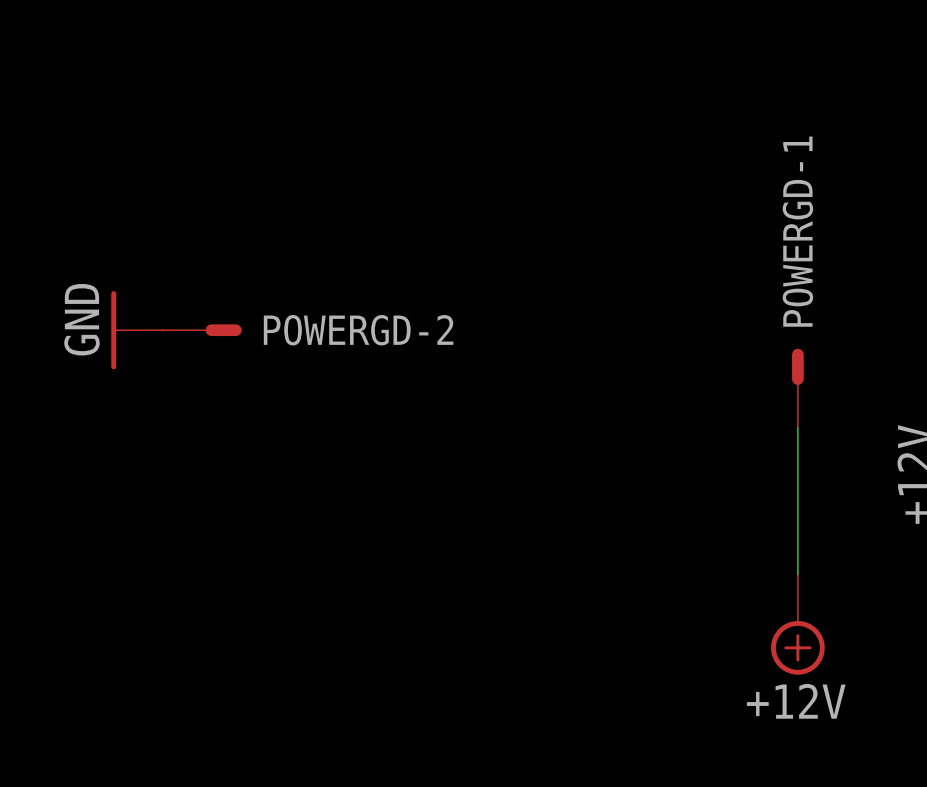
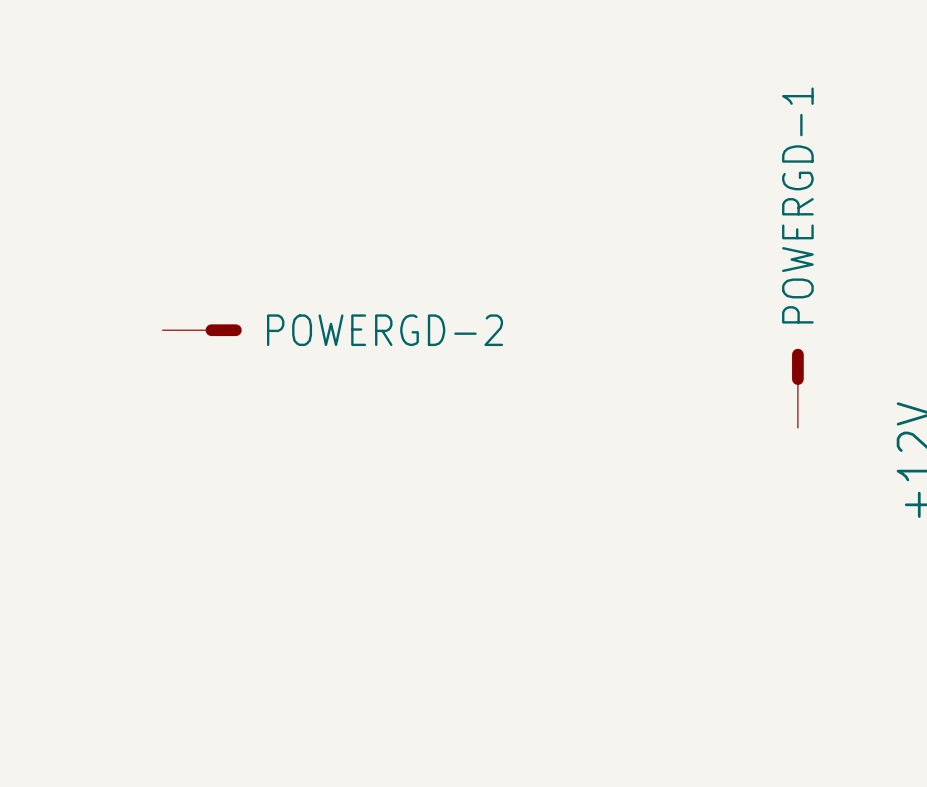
power symbol: GND (136, 330) -> none
wire: (797, 427) (797, 574) -> none
power symbol: +12V (797, 624) -> none

